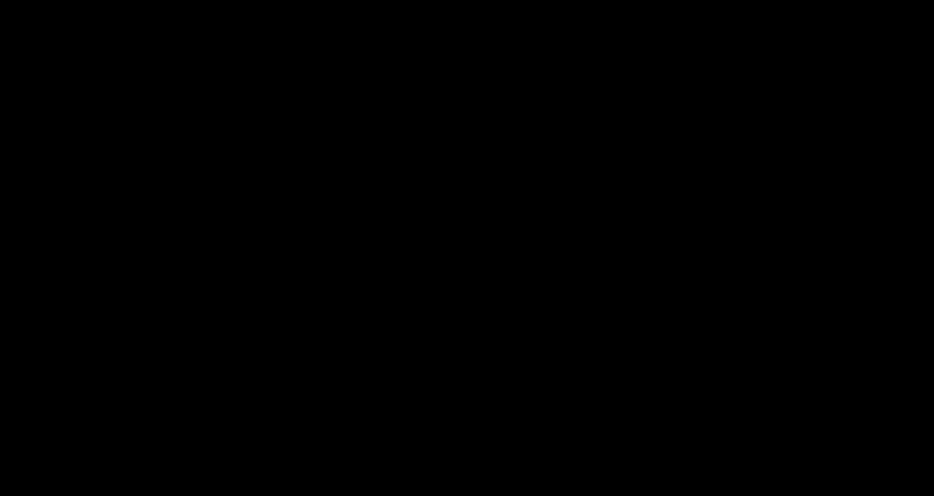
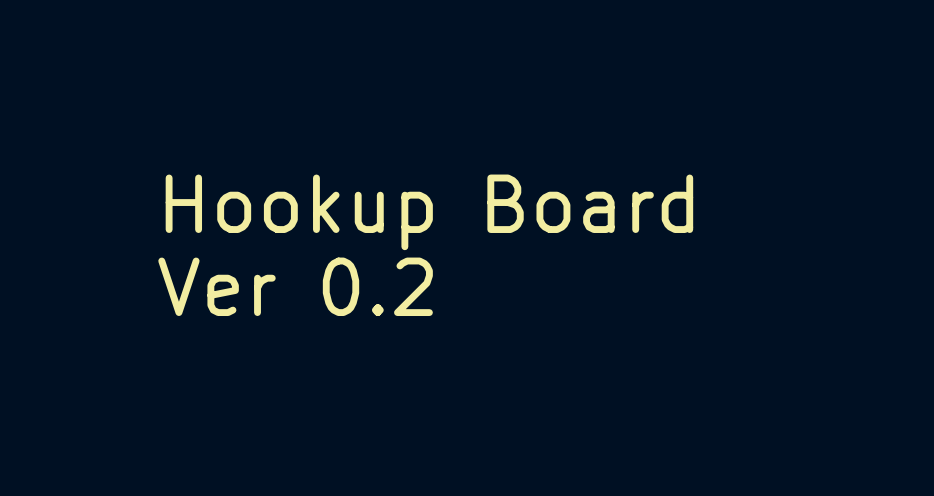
text: none -> Hookup Board (429, 212)
text: none -> Ver 0.2 (295, 286)

